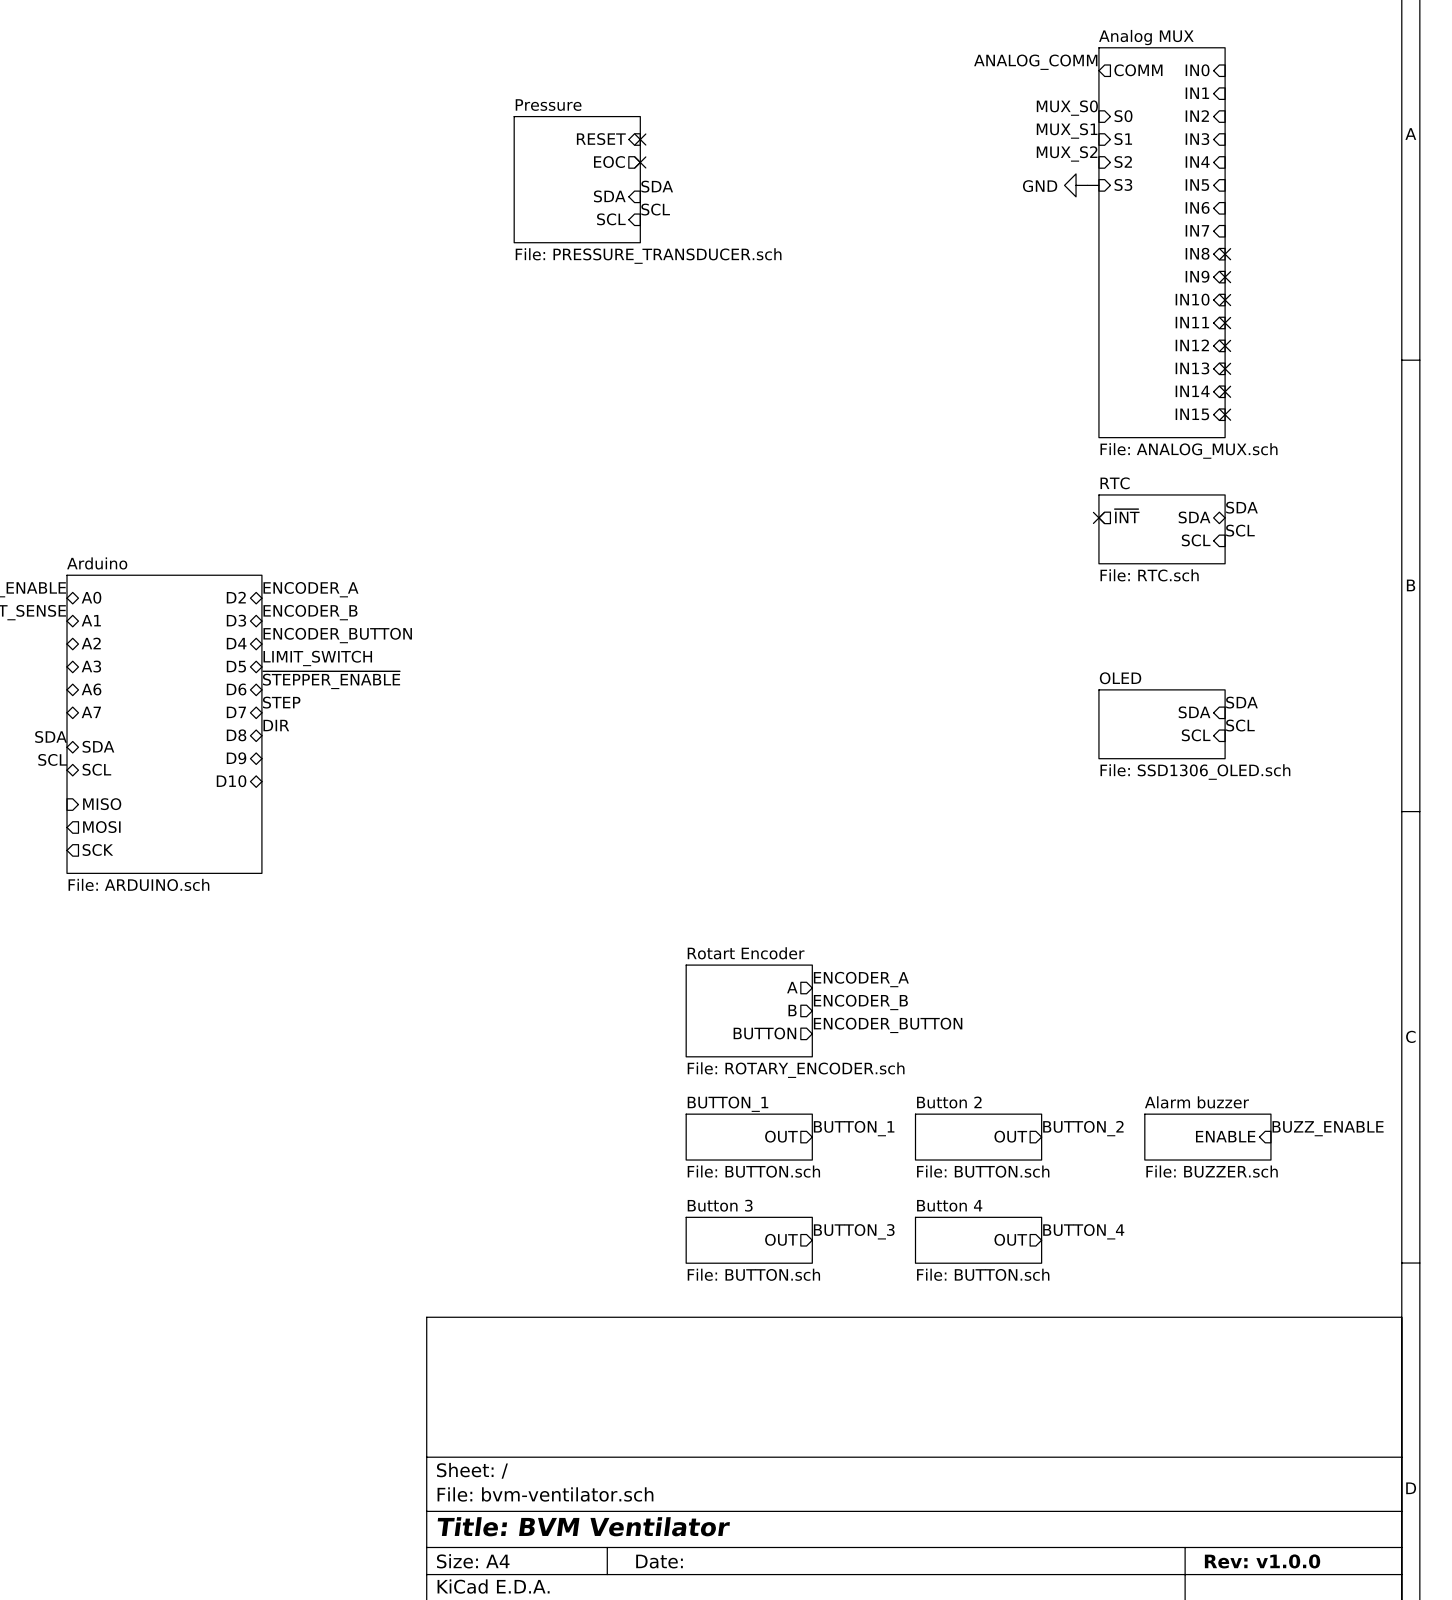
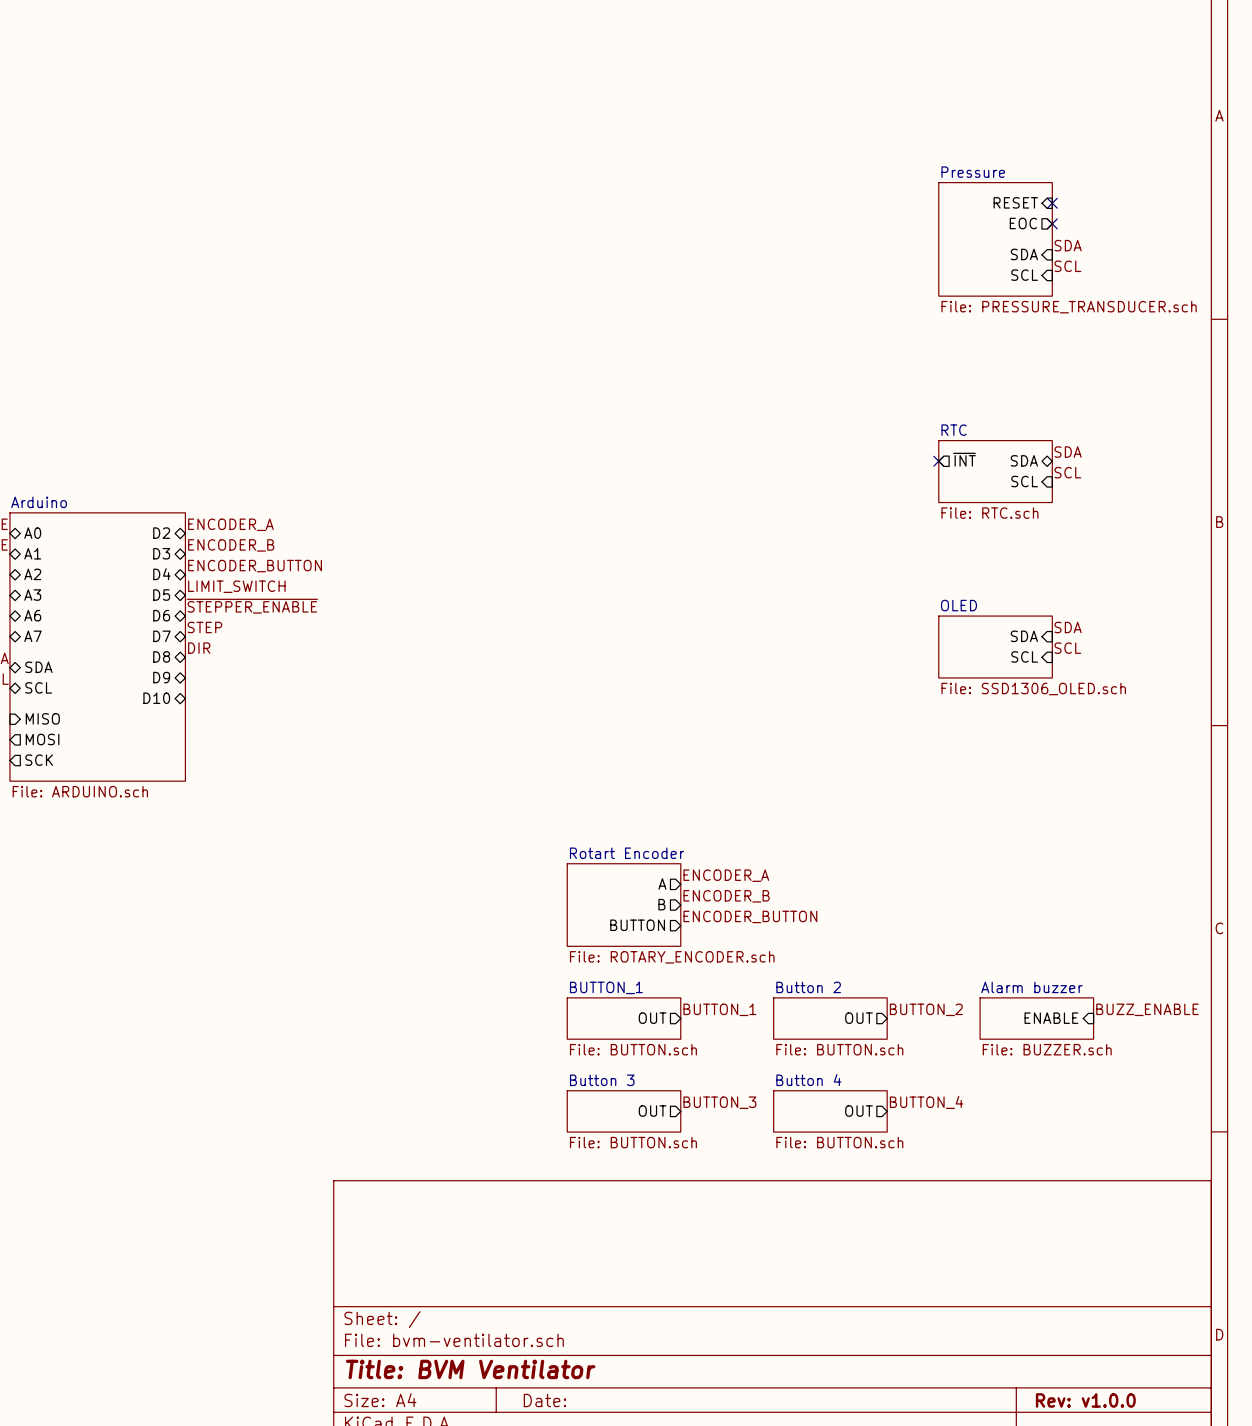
label: ANALOG_COMM (1035, 62) -> none
sheet pin: COMM (1138, 70) -> none
sheet pin: IN0 (1197, 70) -> none
sheet pin: IN1 (1197, 93) -> none
label: MUX_S0 (1067, 108) -> none
sheet pin: S0 (1123, 116) -> none
sheet pin: IN2 (1197, 116) -> none
label: MUX_S1 (1067, 131) -> none
sheet pin: RESET (601, 139) -> none
no-connect mark: (640, 139) -> none
sheet pin: S1 (1123, 139) -> none
sheet pin: IN3 (1197, 139) -> none
label: MUX_S2 (1067, 153) -> none
sheet pin: EOC (609, 162) -> none
no-connect mark: (640, 162) -> none
sheet pin: S2 (1123, 162) -> none
sheet pin: IN4 (1197, 162) -> none
sheet Pressure: File: PRESSURE_TRANSDUCER.sch (577, 179) -> none
sheet pin: S3 (1123, 184) -> none
power symbol: GND (1076, 185) -> none
wire: (1087, 185) (1098, 185) -> none
sheet pin: IN5 (1197, 185) -> none
label: SDA (657, 186) -> none
sheet pin: SDA (609, 196) -> none
sheet pin: IN6 (1197, 207) -> none
label: SCL (655, 209) -> none
sheet pin: SCL (611, 219) -> none
sheet pin: IN7 (1197, 230) -> RESET (1015, 202)
no-connect mark: none -> (1052, 203)
sheet Analog MUX: File: ANALOG_MUX.sch (1162, 242) -> none
sheet pin shape: input (1197, 253) -> output (1023, 223)
sheet pin: IN8 (1197, 253) -> EOC (1023, 223)
sheet Pressure: none -> File: PRESSURE_TRANSDUCER.sch (995, 239)
sheet pin: IN9 (1197, 276) -> none
no-connect mark: (1225, 277) -> none
label: none -> SDA (1068, 245)
sheet pin: none -> SDA (1024, 254)
sheet pin: IN10 (1192, 299) -> none
no-connect mark: (1225, 300) -> none
label: none -> SCL (1067, 266)
sheet pin: none -> SCL (1024, 275)
sheet pin: IN11 (1192, 322) -> none
no-connect mark: (1225, 322) -> none
sheet pin: IN12 (1192, 345) -> none
no-connect mark: (1225, 345) -> none
sheet pin: IN13 (1192, 368) -> none
no-connect mark: (1225, 368) -> none
sheet pin: IN14 (1192, 391) -> none
no-connect mark: (1225, 391) -> none
sheet pin: IN15 (1192, 414) -> none
no-connect mark: (1225, 414) -> none

